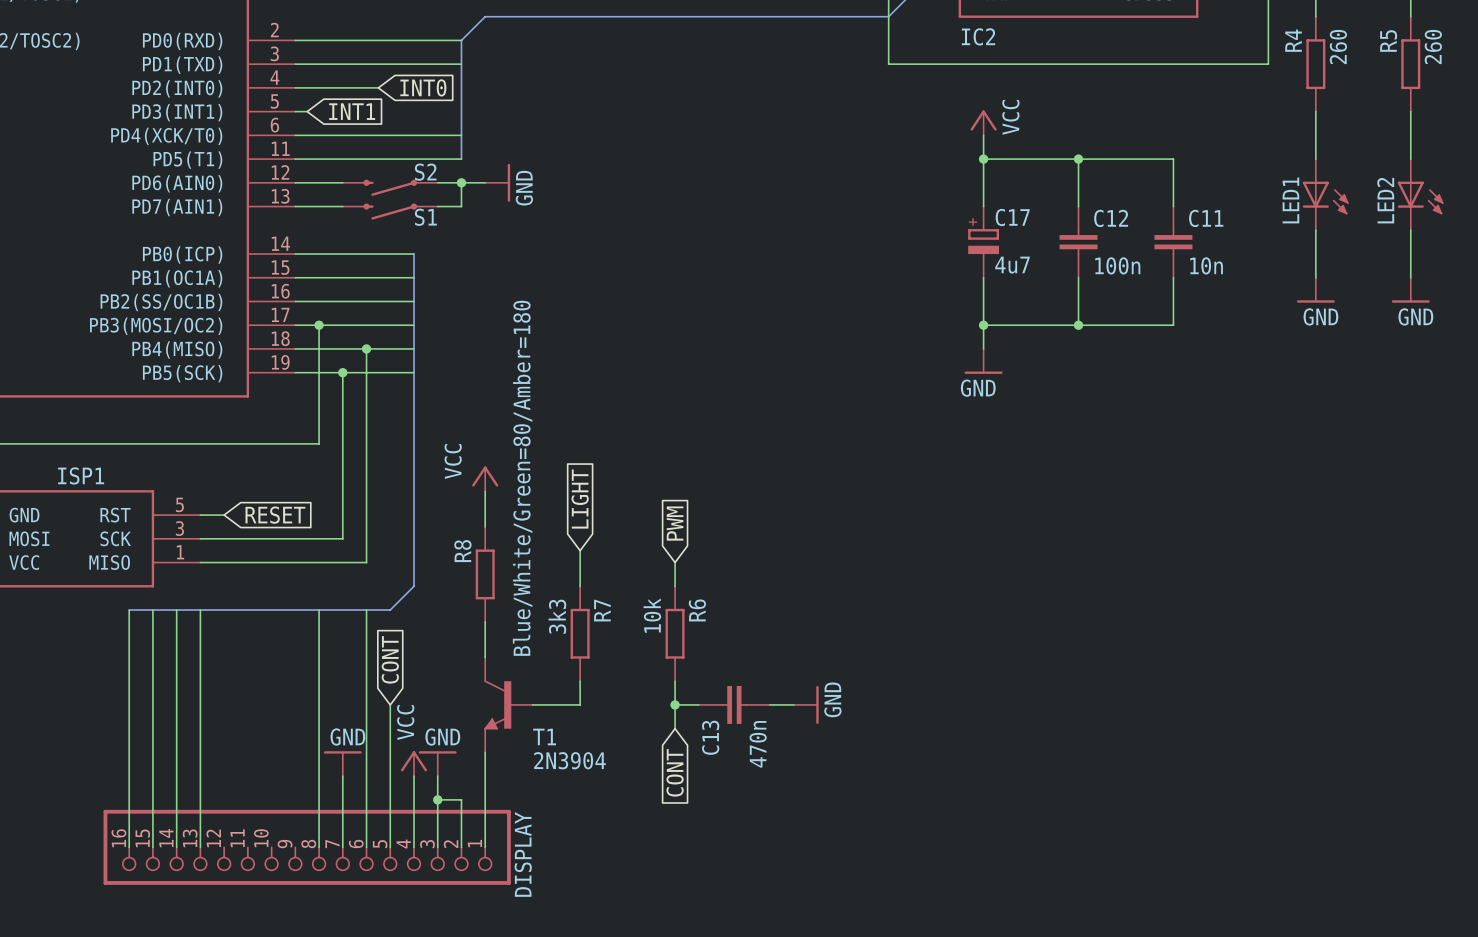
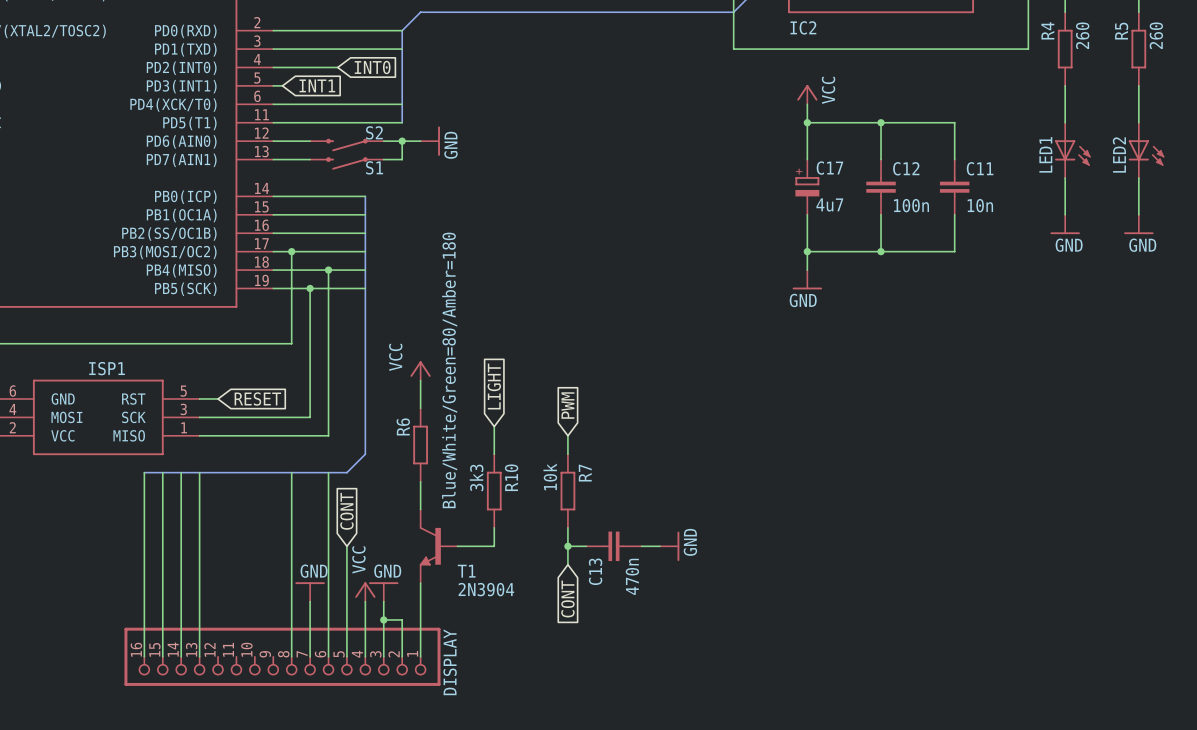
R8 name: R8 (462, 551) -> R6 (403, 426)
R7 name: R7 (602, 610) -> R10 (511, 477)
R6 name: R6 (697, 610) -> R7 (585, 473)

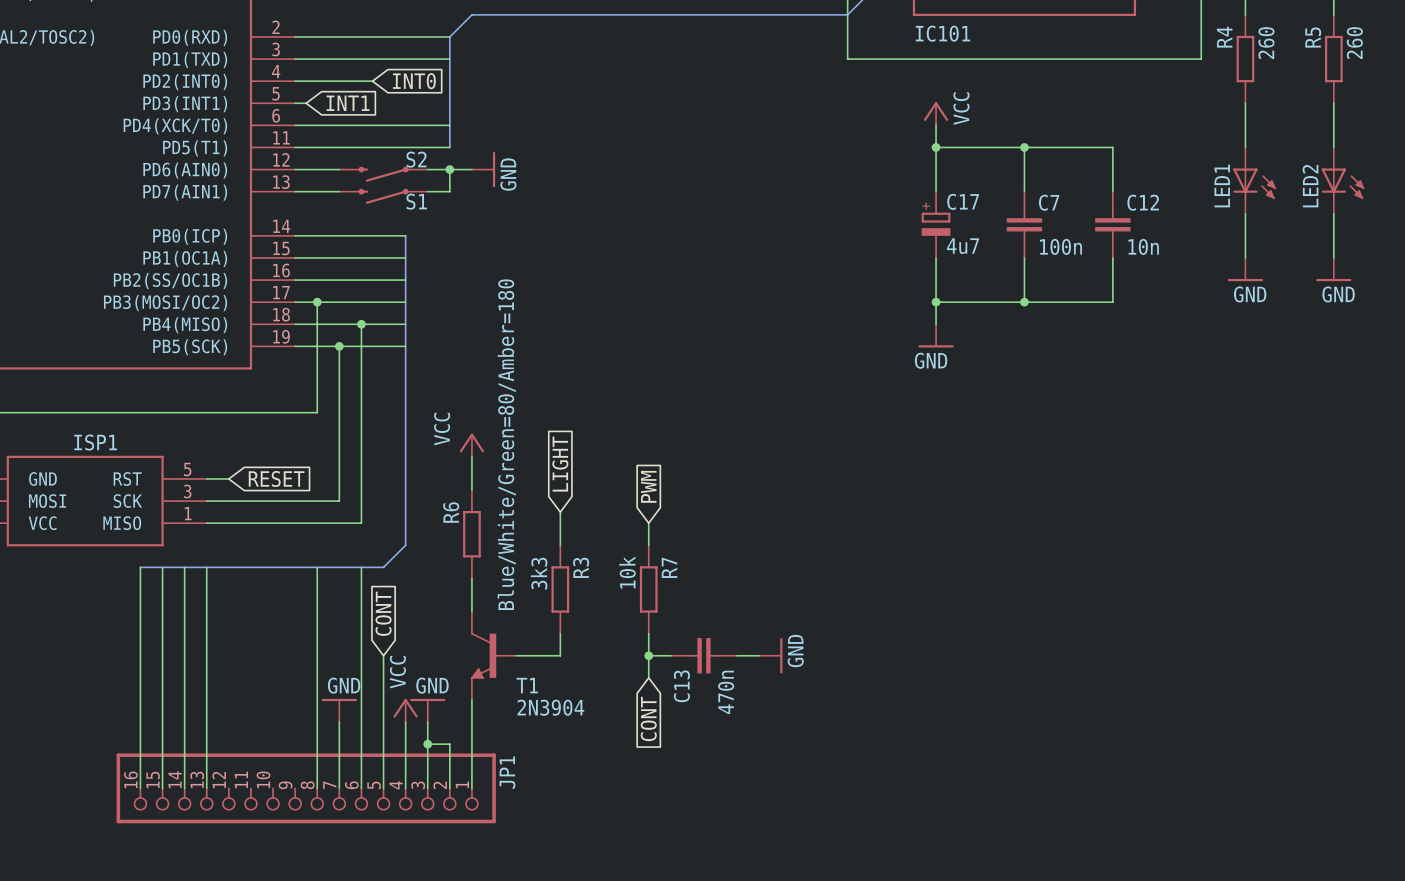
IC2 name: IC2 (803, 27) -> IC101 (942, 33)
C12 name: C12 (906, 168) -> C7 (1049, 202)
C11 name: C11 (980, 168) -> C12 (1143, 202)
R10 name: R10 (511, 477) -> R3 (581, 567)
DISPLAY name: DISPLAY (450, 662) -> JP1 (507, 772)

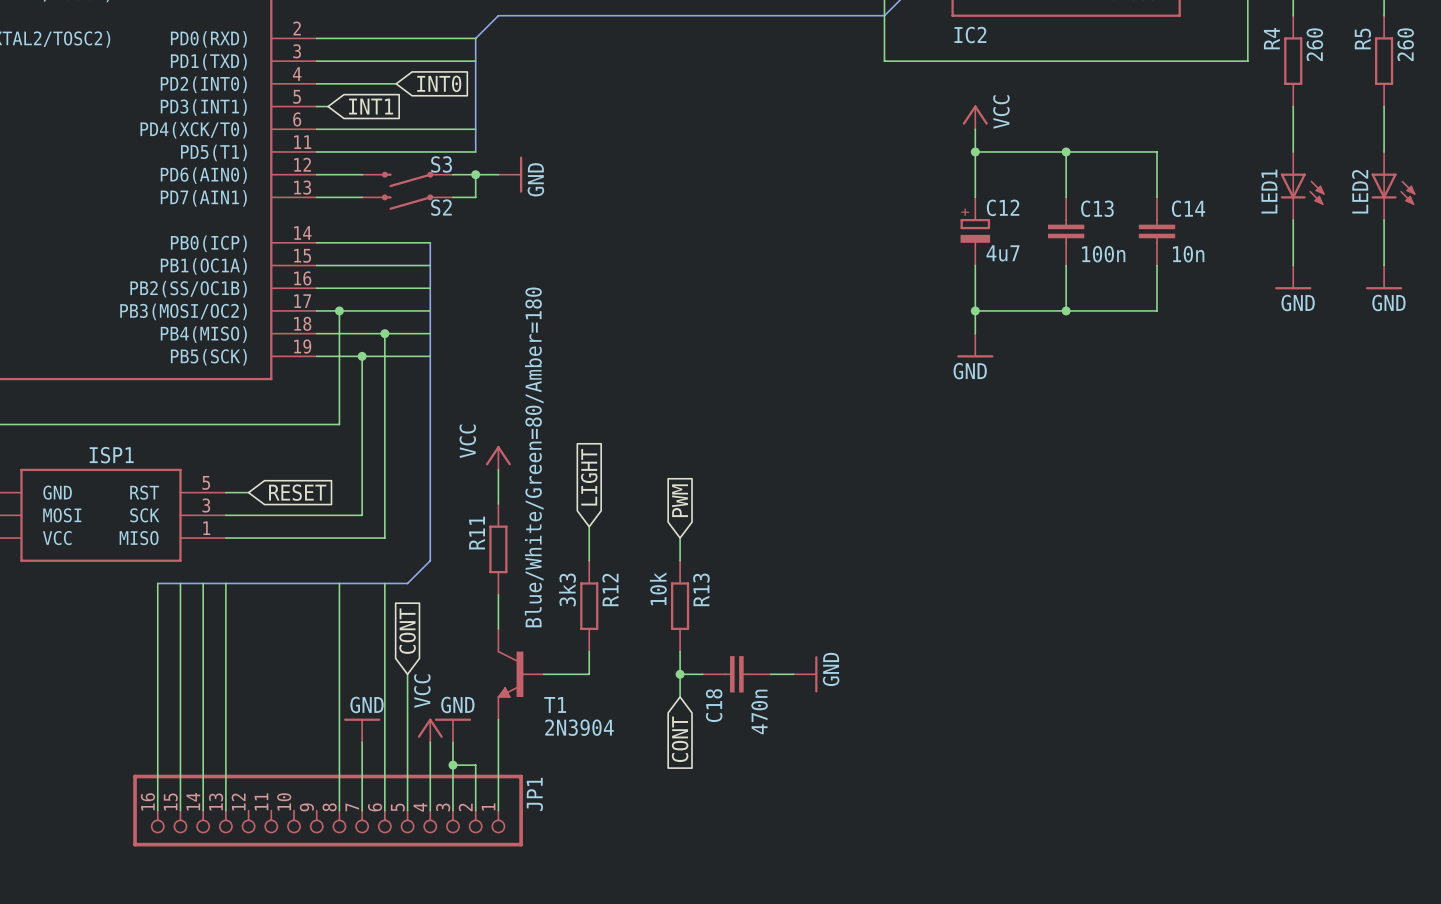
IC101 name: IC101 (942, 33) -> IC2 (970, 35)
S2 name: S2 (416, 159) -> S3 (441, 164)
S1 name: S1 (416, 201) -> S2 (441, 207)
C17 name: C17 (963, 201) -> C12 (1003, 207)
C7 name: C7 (1049, 202) -> C13 (1097, 208)
C12 name: C12 (1143, 202) -> C14 (1188, 208)
R6 name: R6 (451, 512) -> R11 (477, 533)
R3 name: R3 (581, 567) -> R12 (610, 589)
R7 name: R7 (669, 567) -> R13 (701, 589)
C13 name: C13 (681, 686) -> C18 (714, 705)

